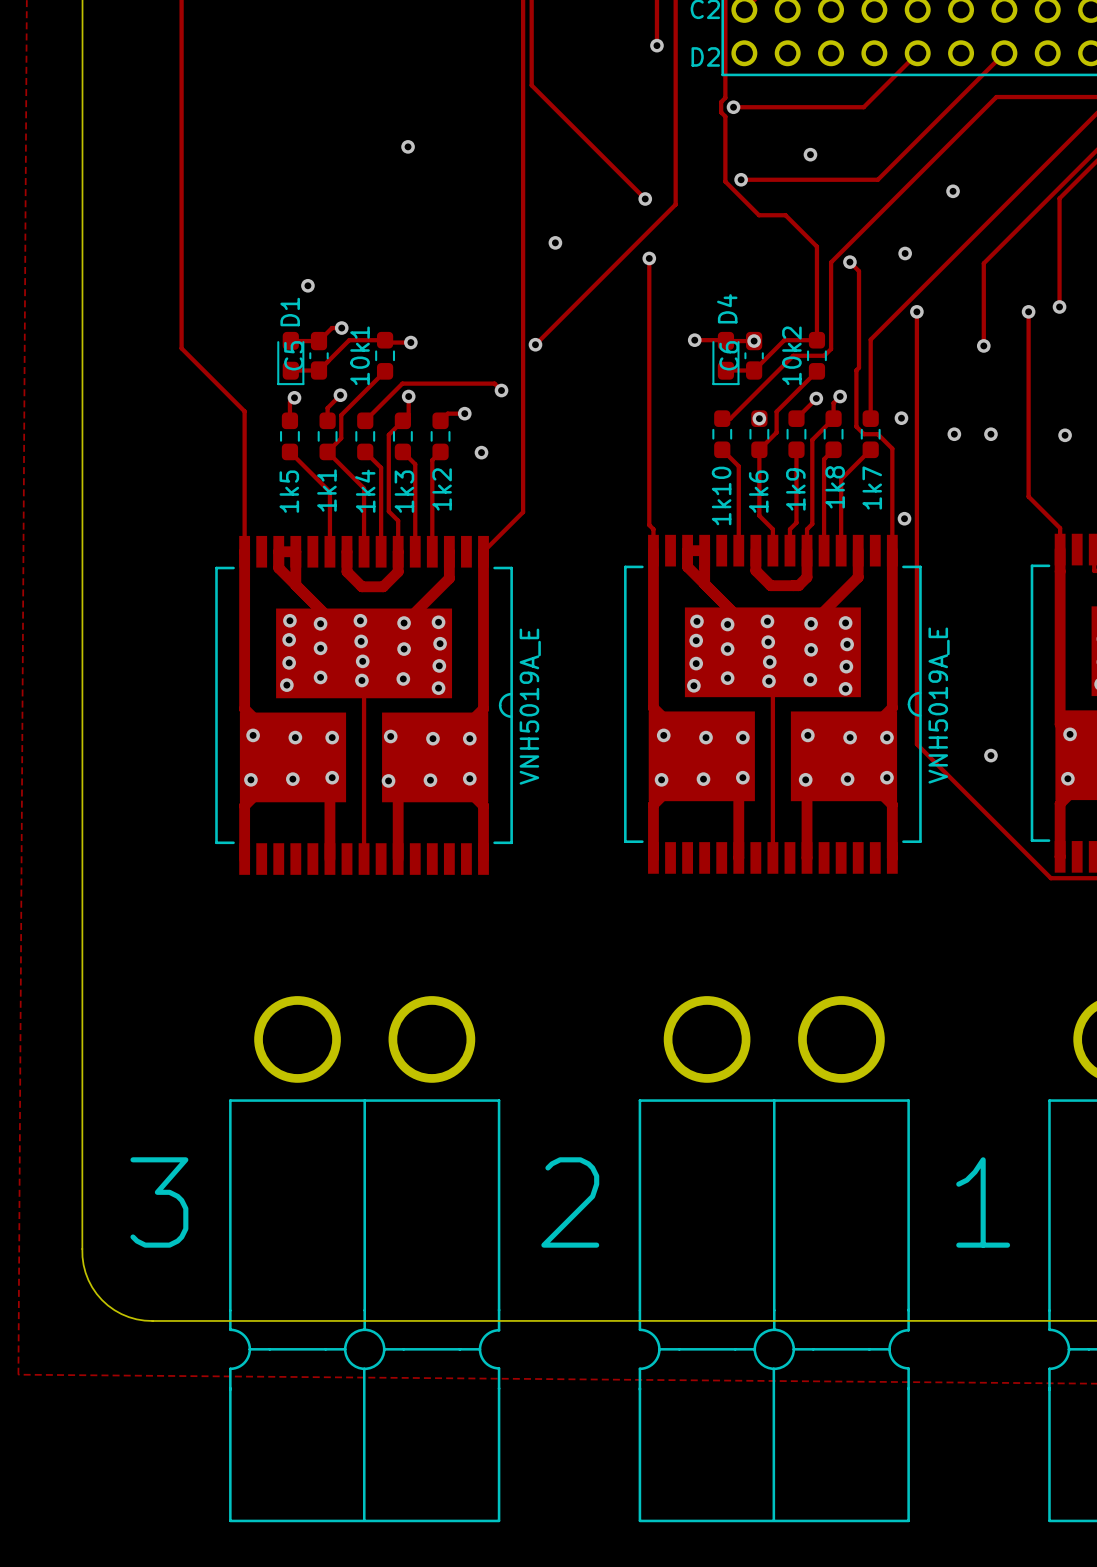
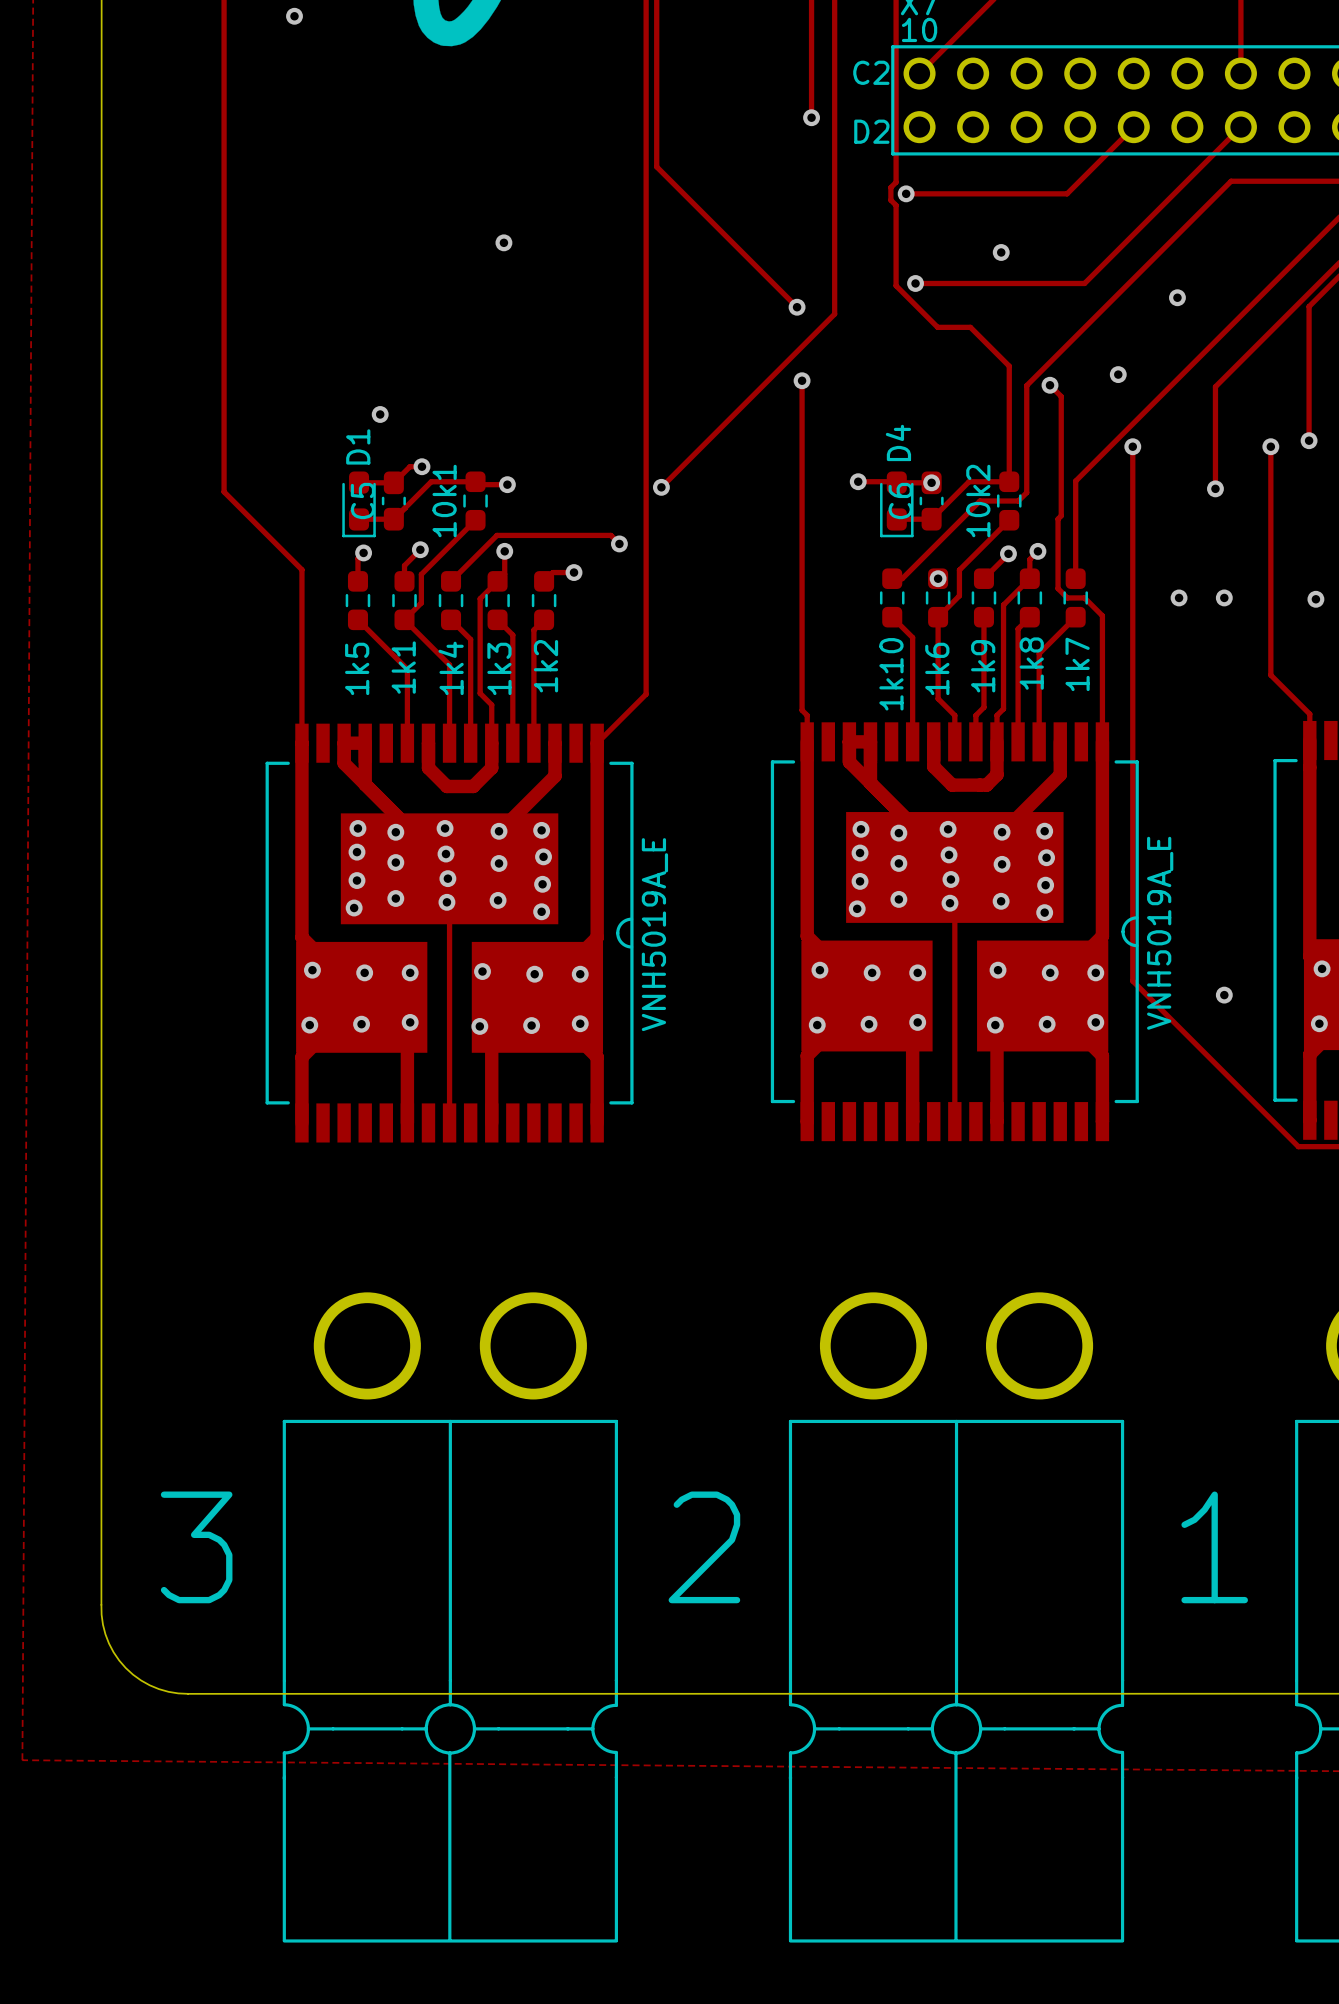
via: (555, 242) -> none
via: (901, 418) -> none
via: (481, 452) -> none
via: (904, 518) -> none

